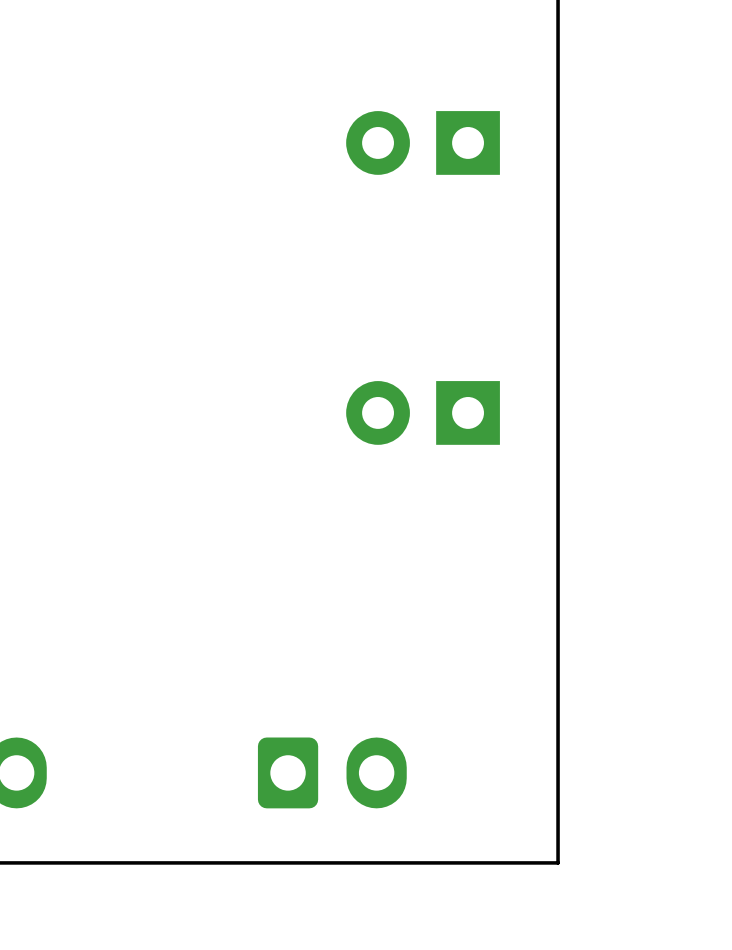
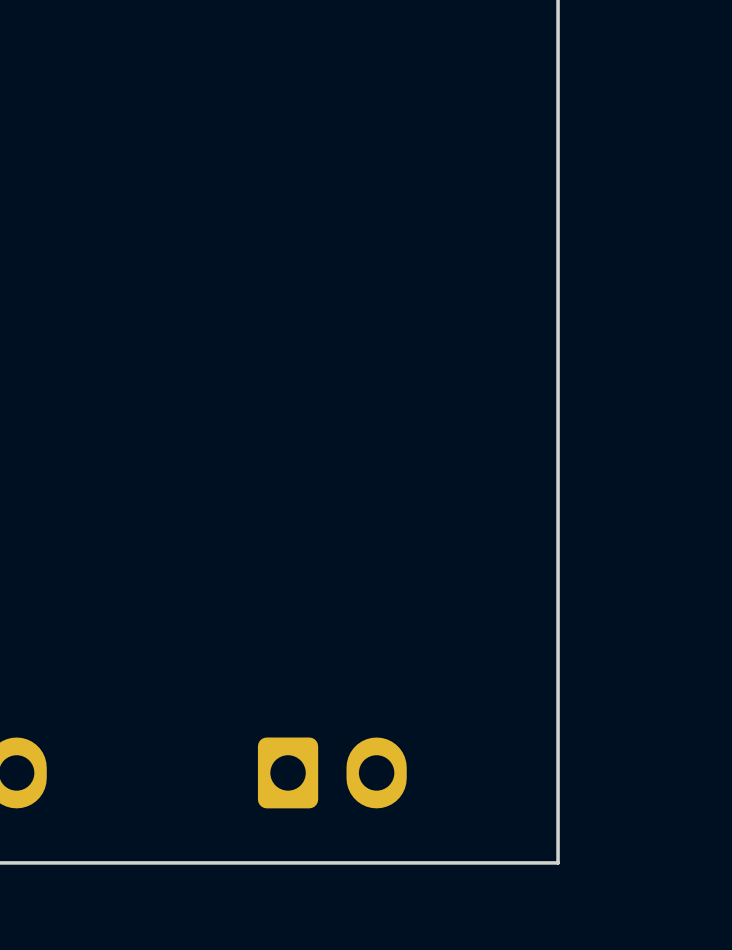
part: (423, 142) -> none
part: (423, 412) -> none

